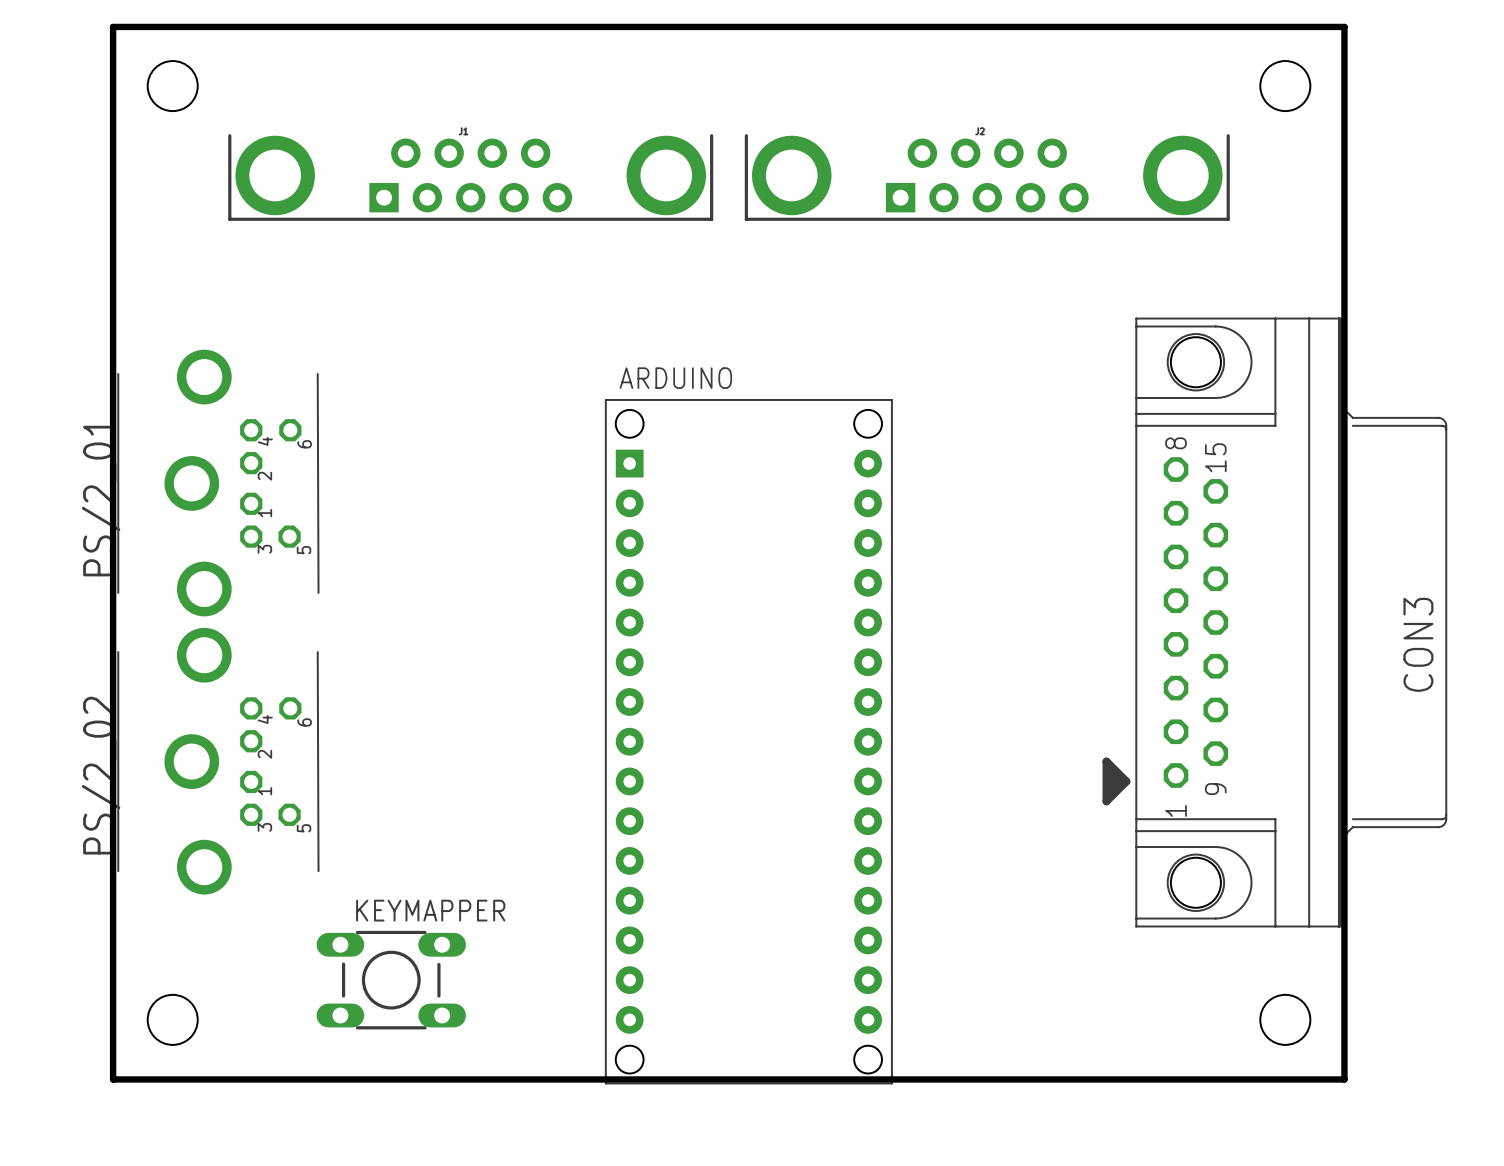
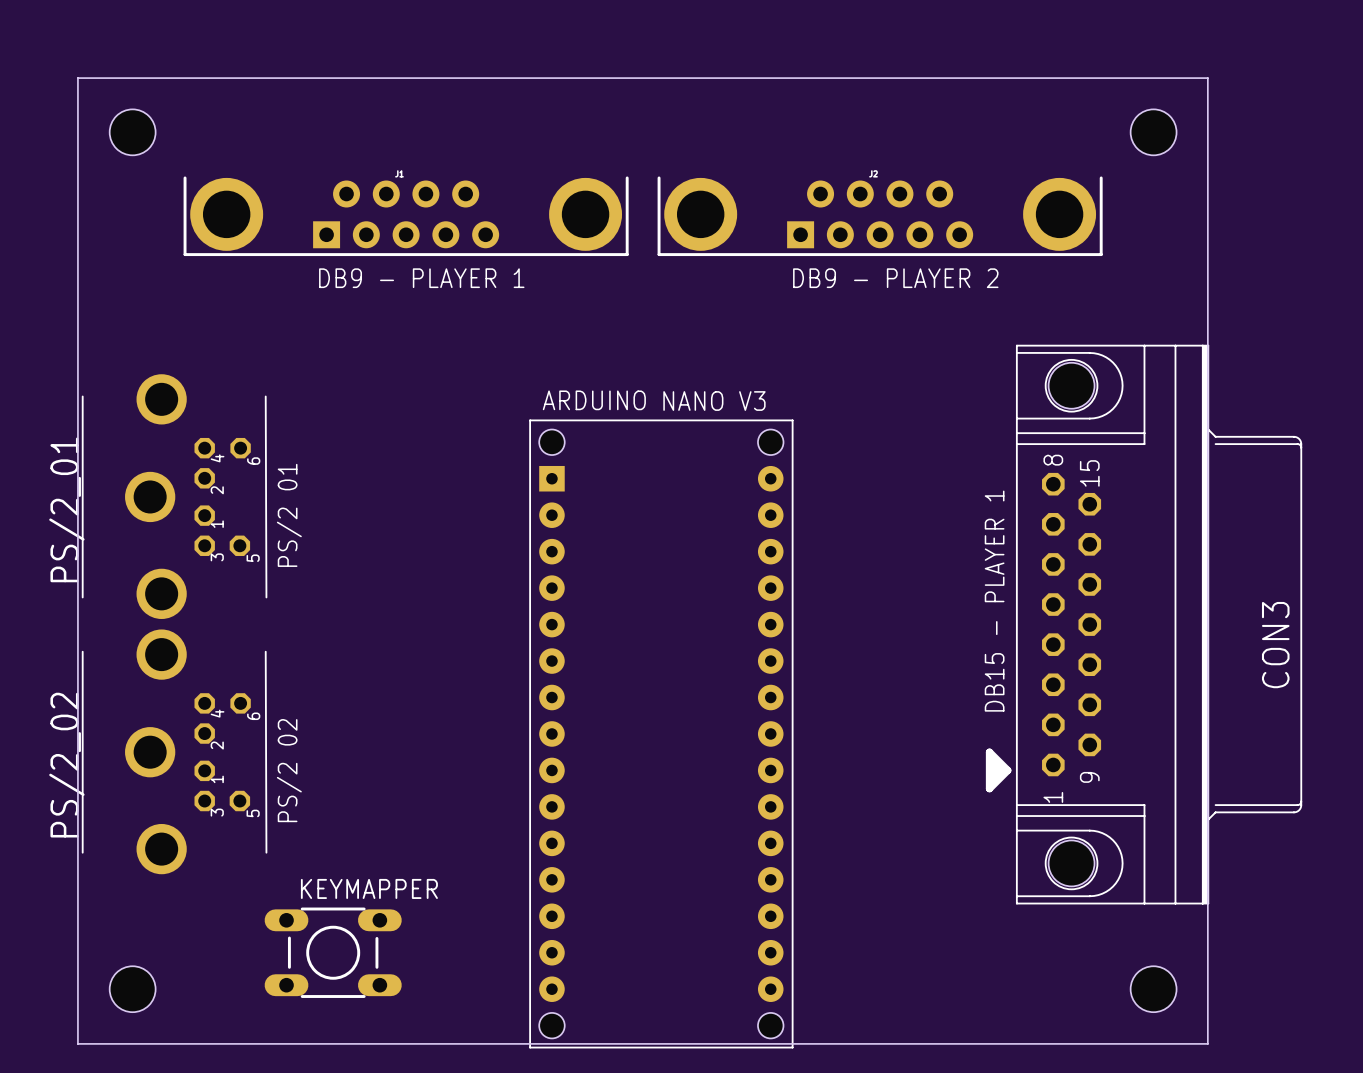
board edge width: thick (113, 26) (1344, 26) (1344, 1079) (113, 1079) (113, 26) -> thin (77, 78) (1207, 78) (1207, 1043) (77, 1043) (77, 78)
text: none -> DB9 - PLAYER 1 (421, 278)
text: none -> DB9 - PLAYER 2 (895, 278)
text: none -> NANO V3 (714, 401)
text: none -> PS/2 01 (289, 515)
text: none -> DB15 - PLAYER 1 (994, 601)
text: none -> PS/2 02 (289, 770)

